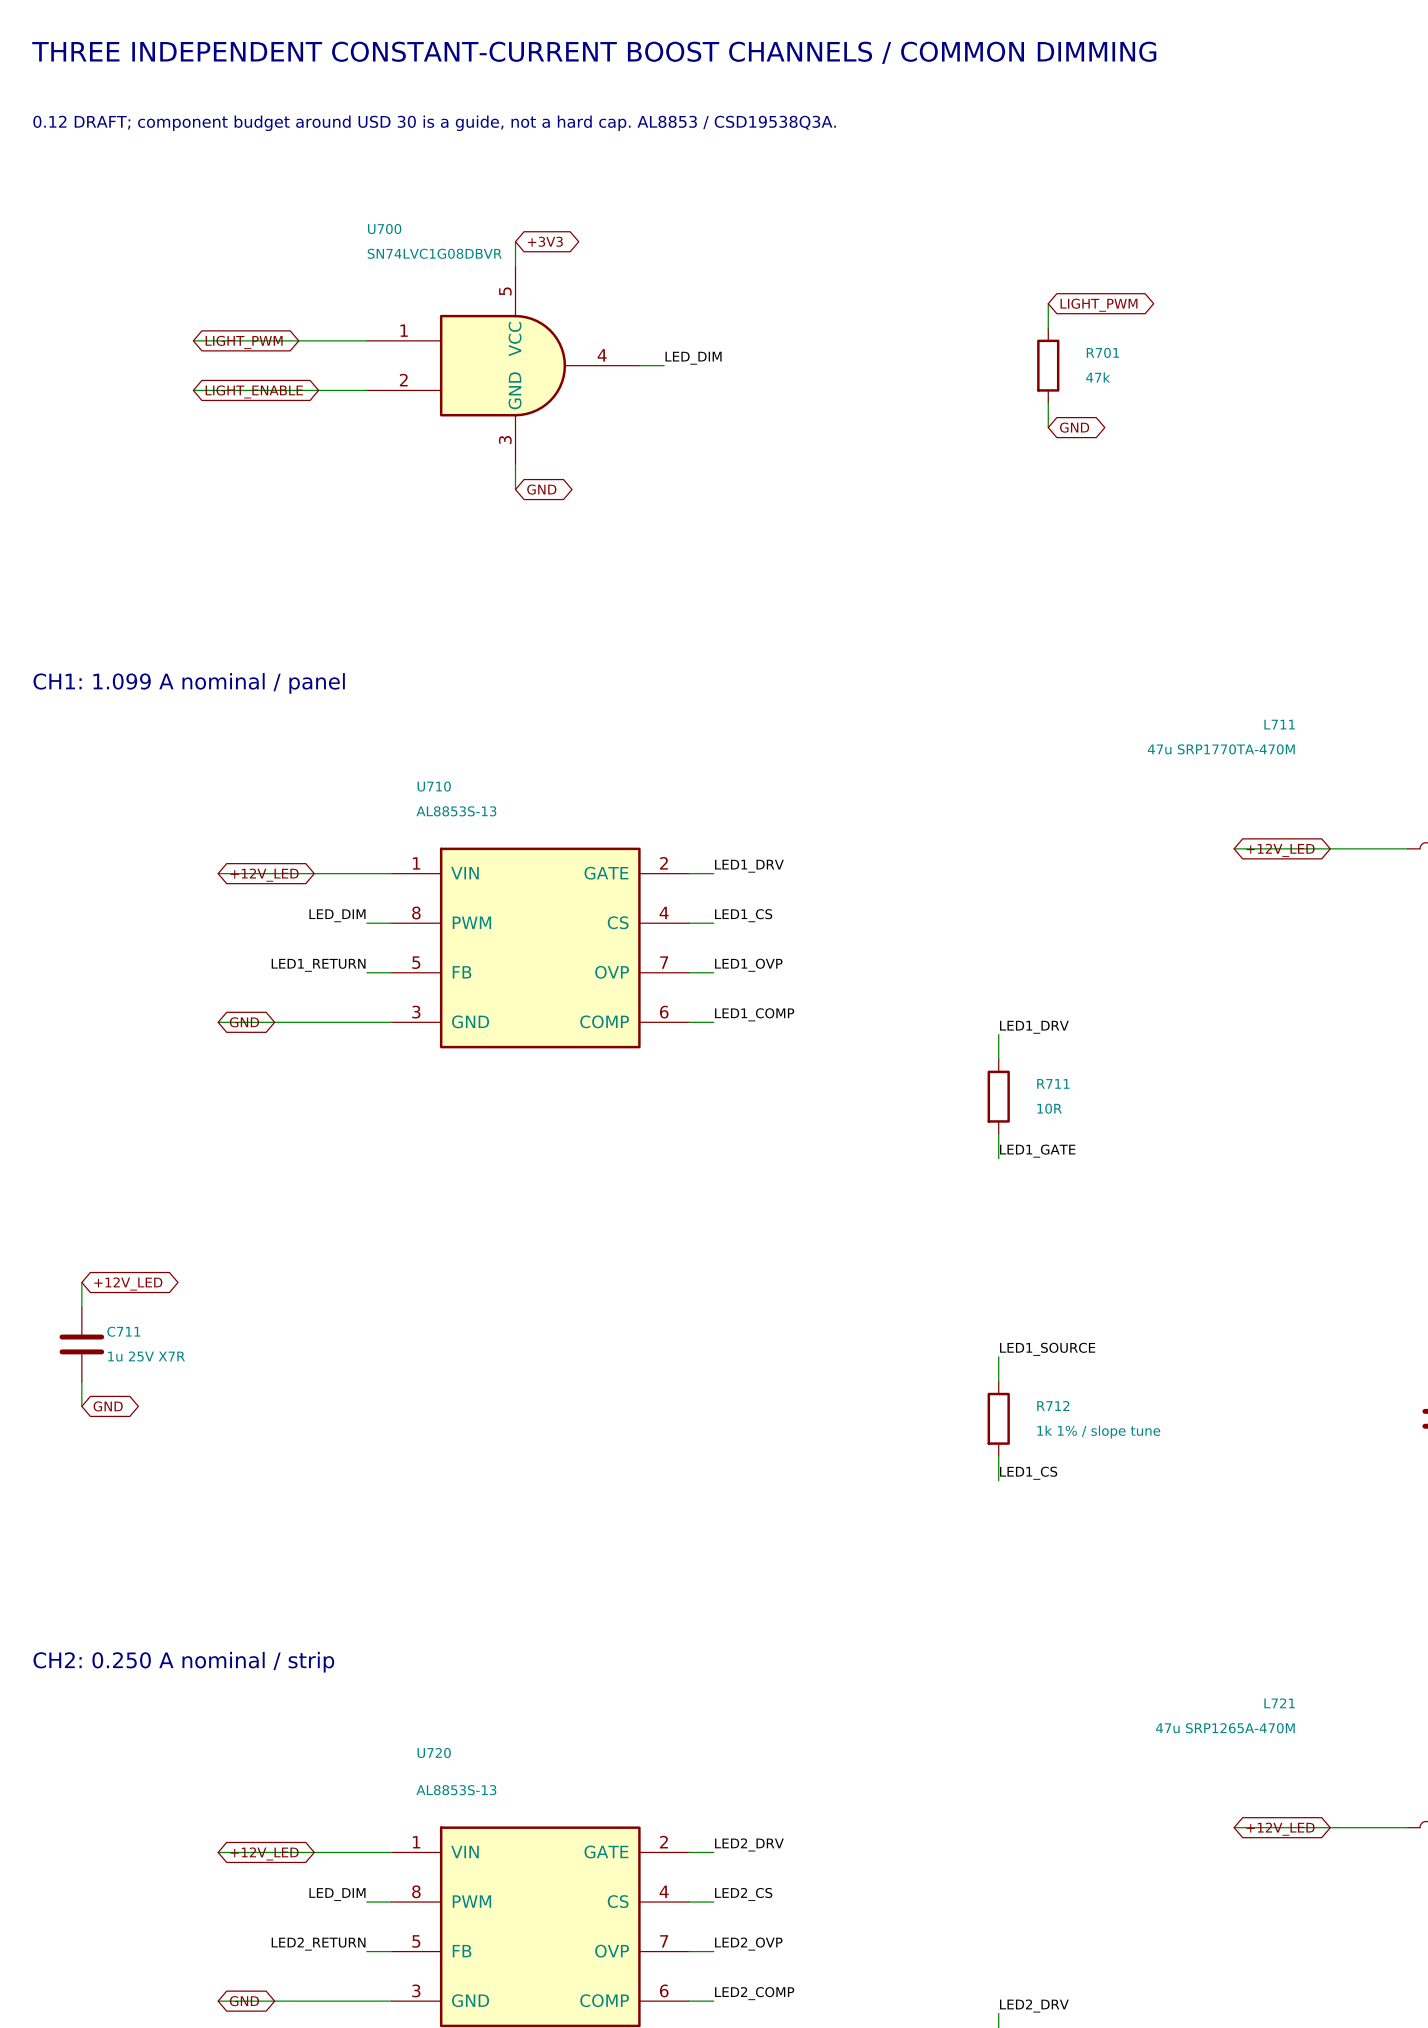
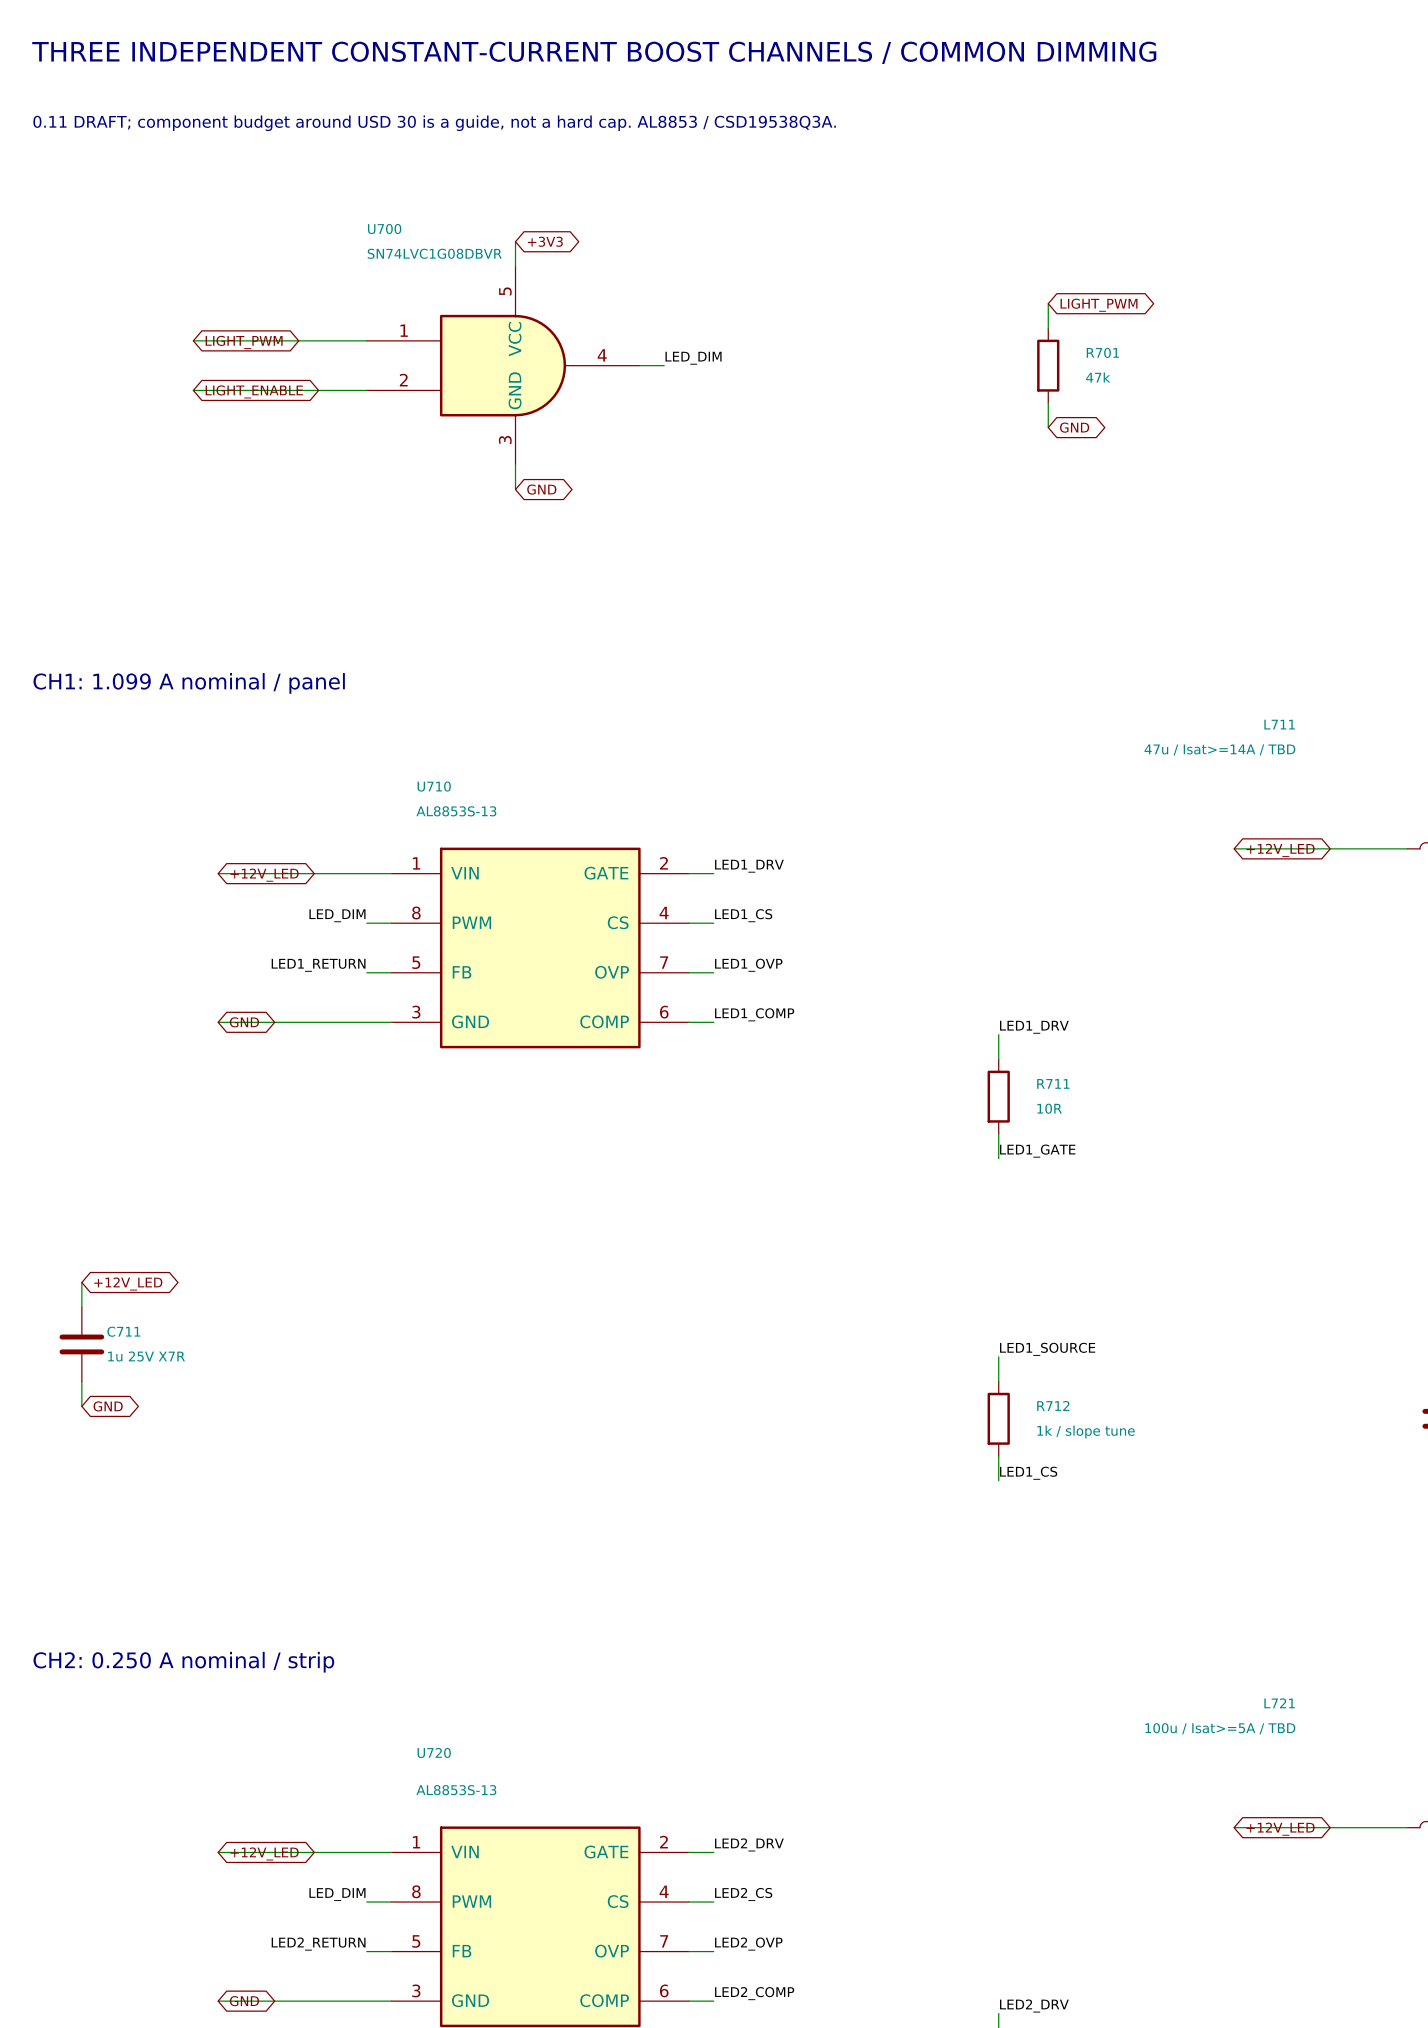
text: 0.12 DRAFT; component budget around USD 30 is a guide, not a hard cap. AL8853 / CSD19538Q3A. (434, 123) -> 0.11 DRAFT; component budget around USD 30 is a guide, not a hard cap. AL8853 / CSD19538Q3A. (434, 123)
L711 value: 47u SRP1770TA-470M (1221, 749) -> 47u / Isat>=14A / TBD (1219, 750)
R712 value: 1k 1% / slope tune (1098, 1432) -> 1k / slope tune (1086, 1432)
L721 value: 47u SRP1265A-470M (1225, 1728) -> 100u / Isat>=5A / TBD (1220, 1728)

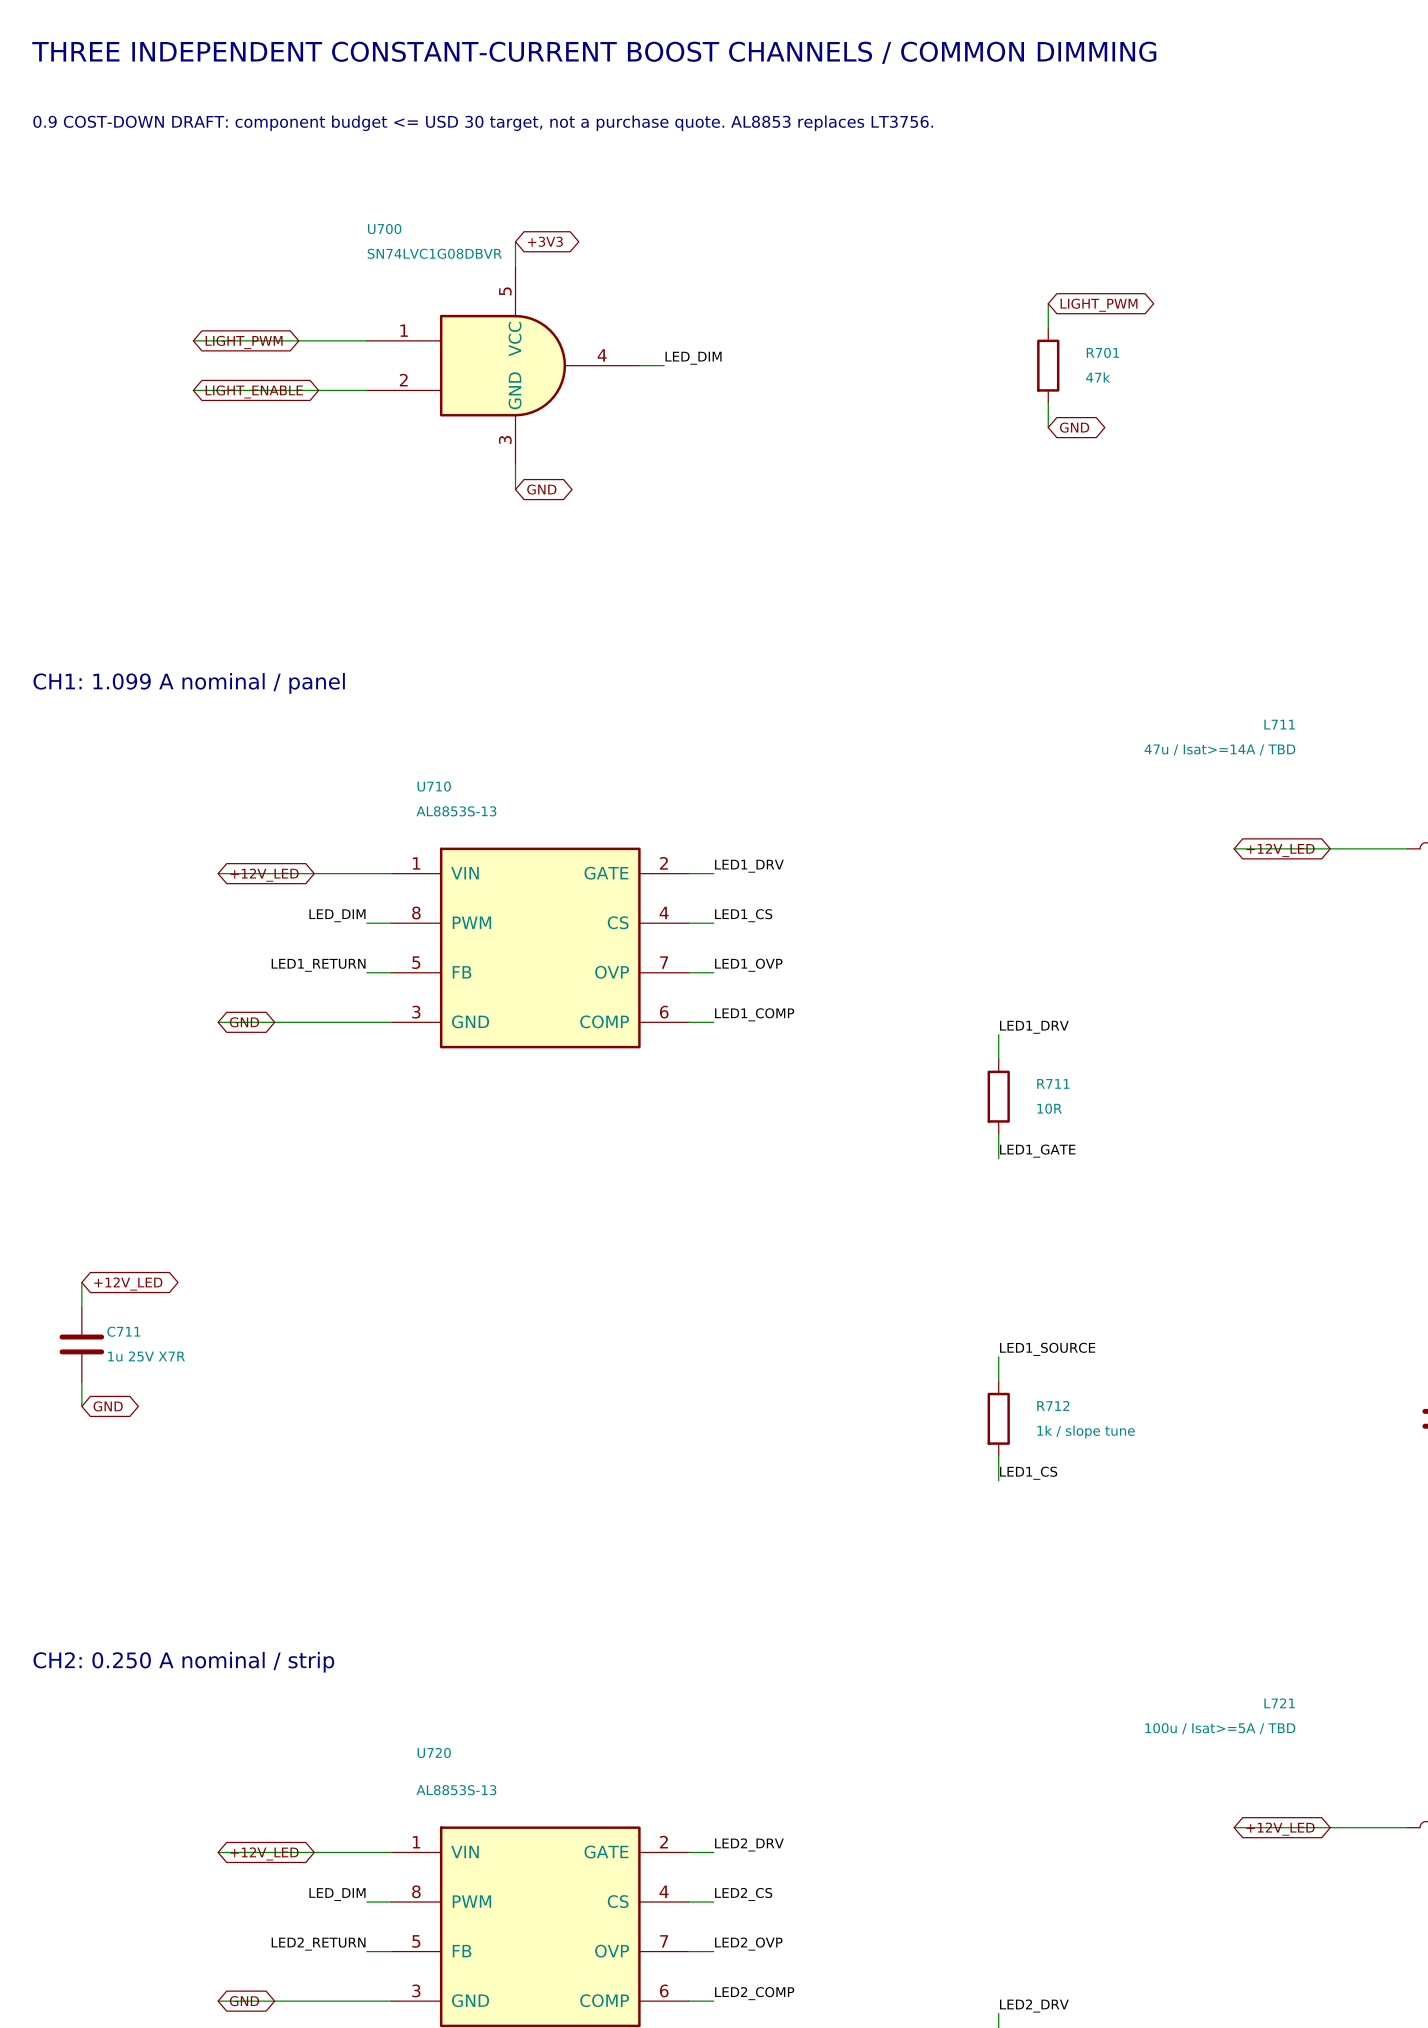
text: 0.11 DRAFT; component budget around USD 30 is a guide, not a hard cap. AL8853 / CSD19538Q3A. (434, 123) -> 0.9 COST-DOWN DRAFT: component budget <= USD 30 target, not a purchase quote. AL8853 replaces LT3756. (483, 123)

